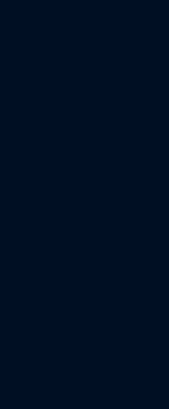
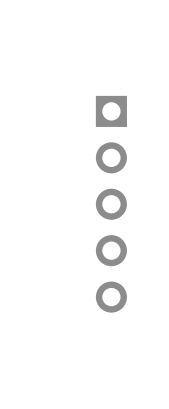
part: none -> (111, 204)

